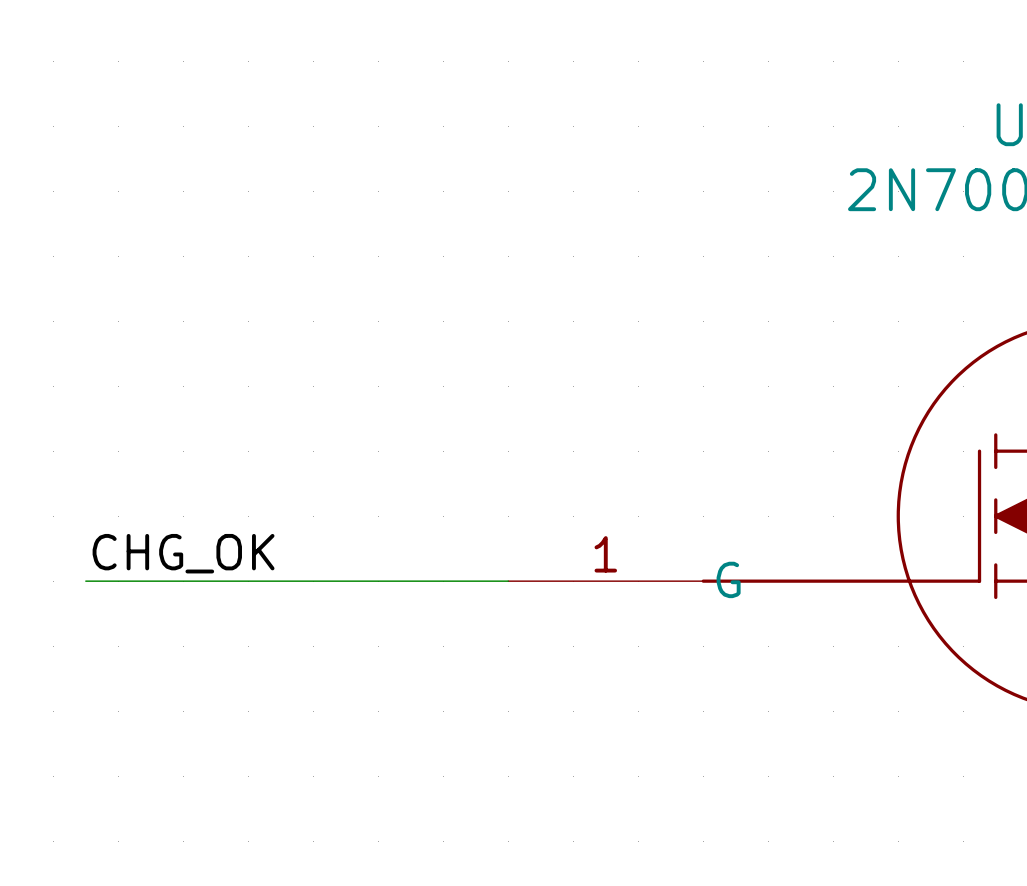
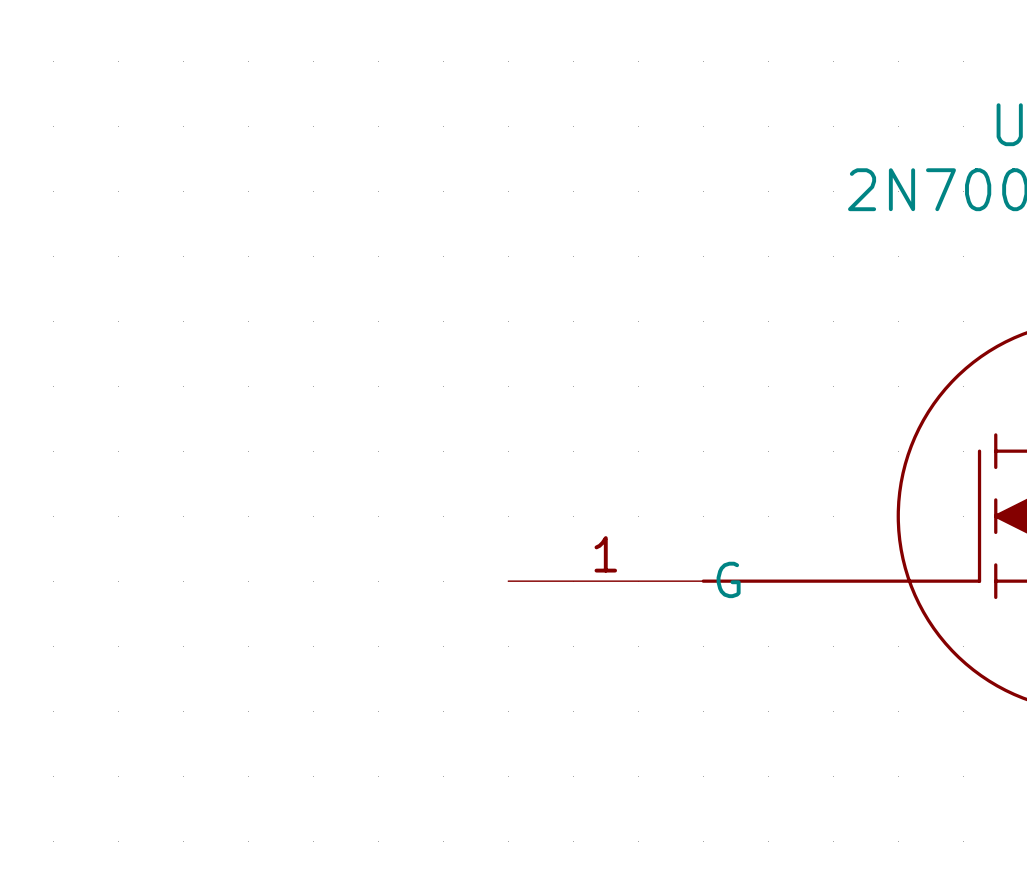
label: CHG_OK (183, 553) -> none
wire: (85, 581) (508, 581) -> none

